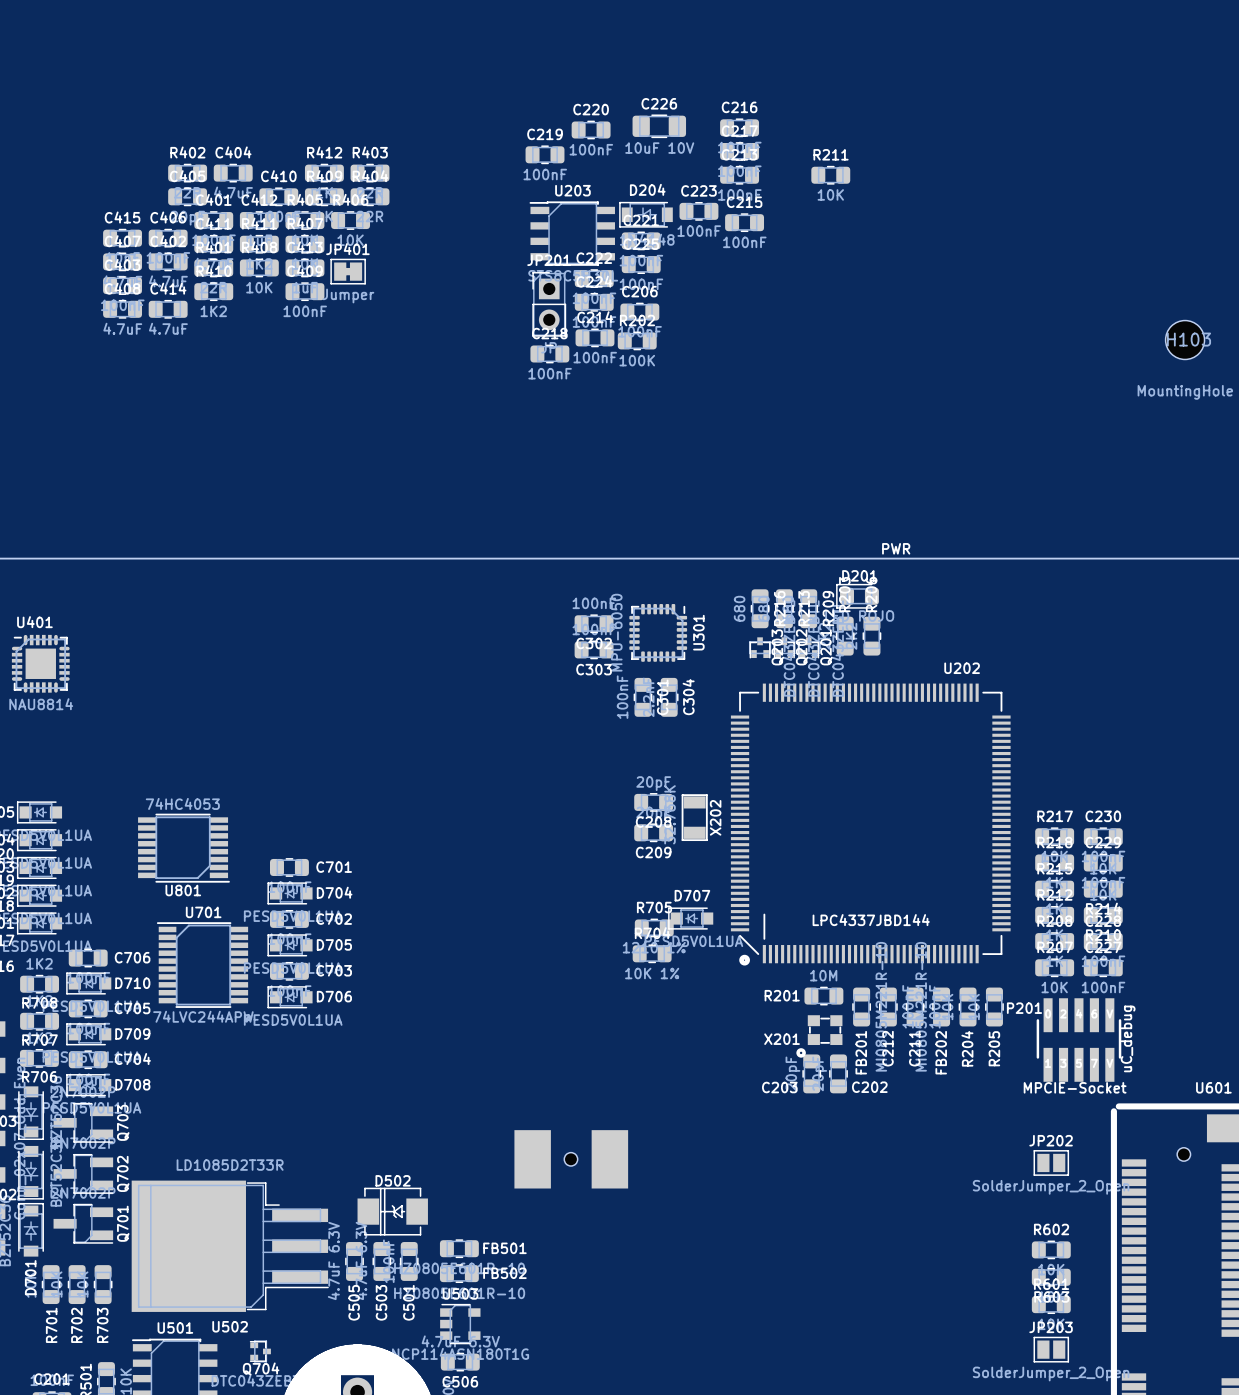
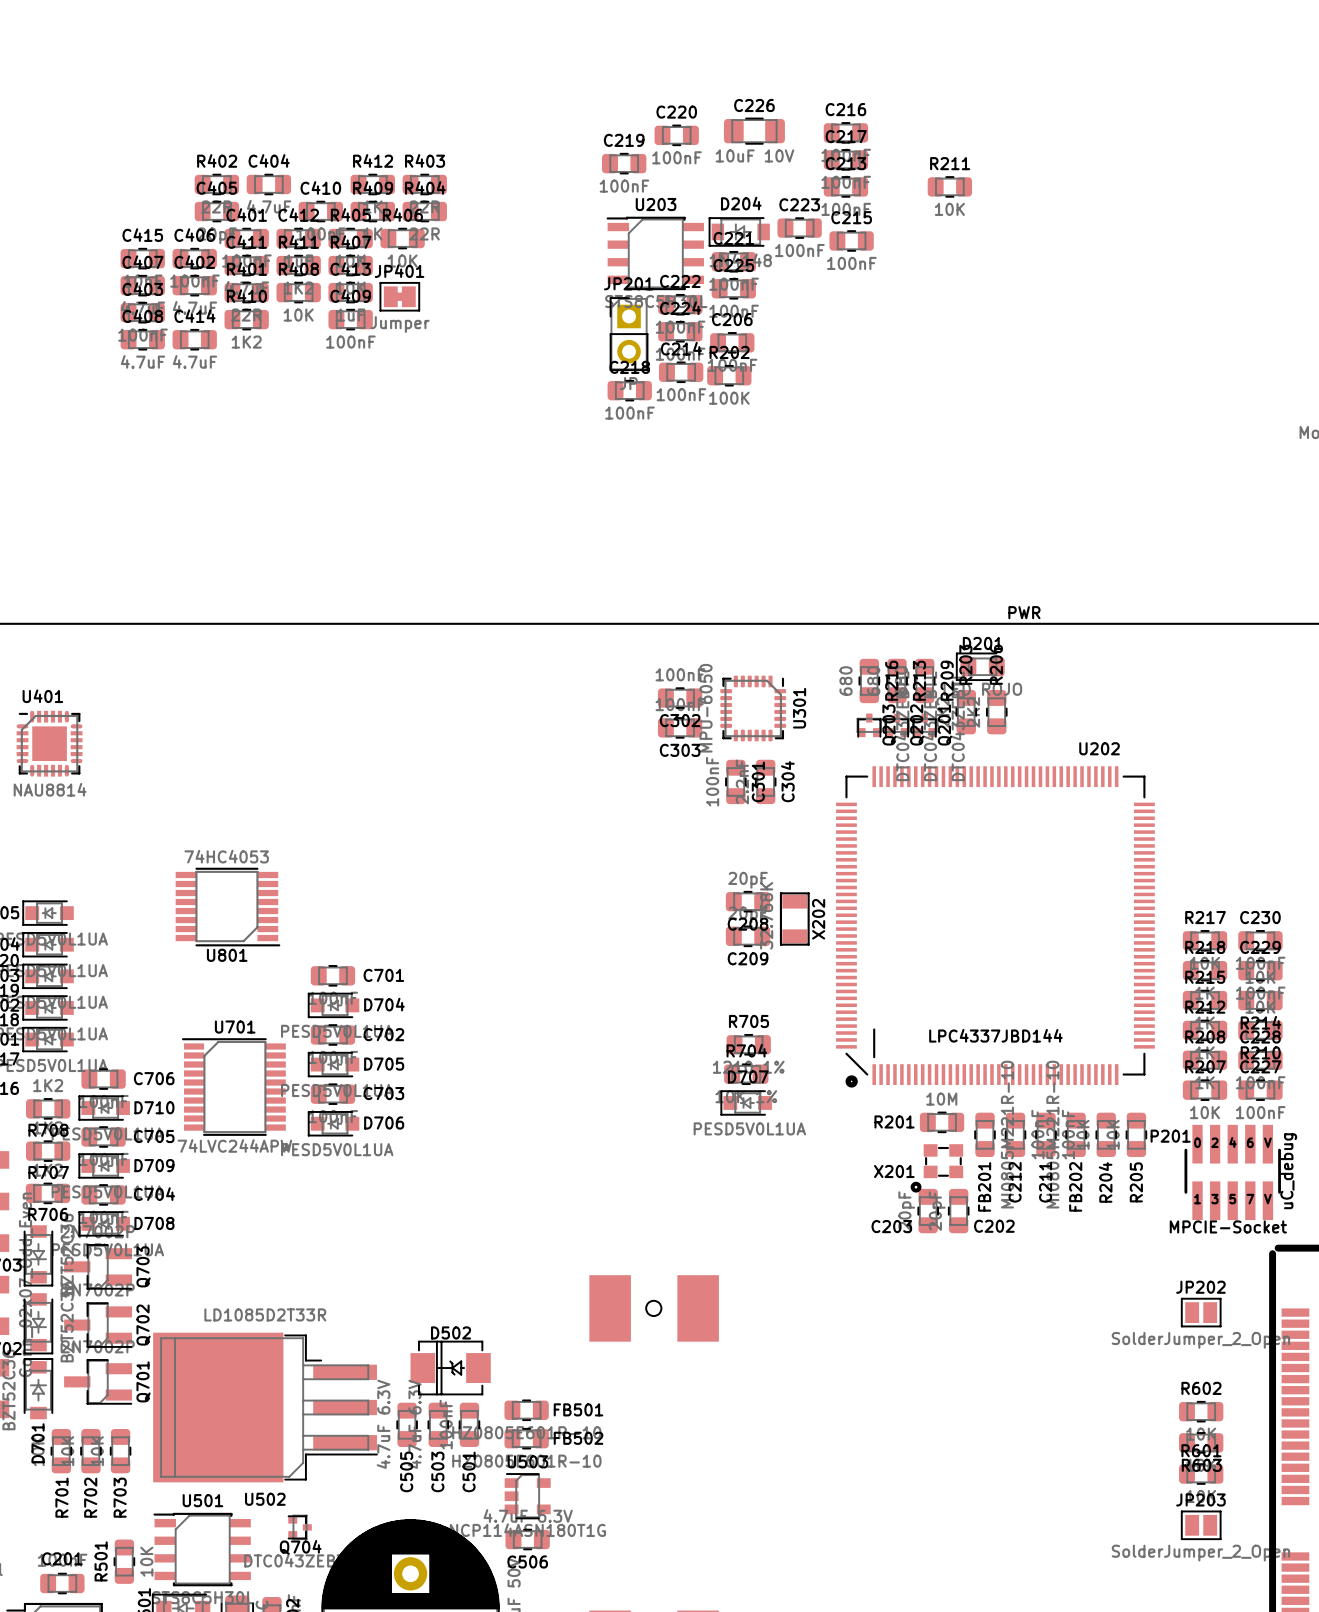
U801 position: (183, 848) -> (227, 907)
D707 position: (690, 918) -> (746, 1102)

